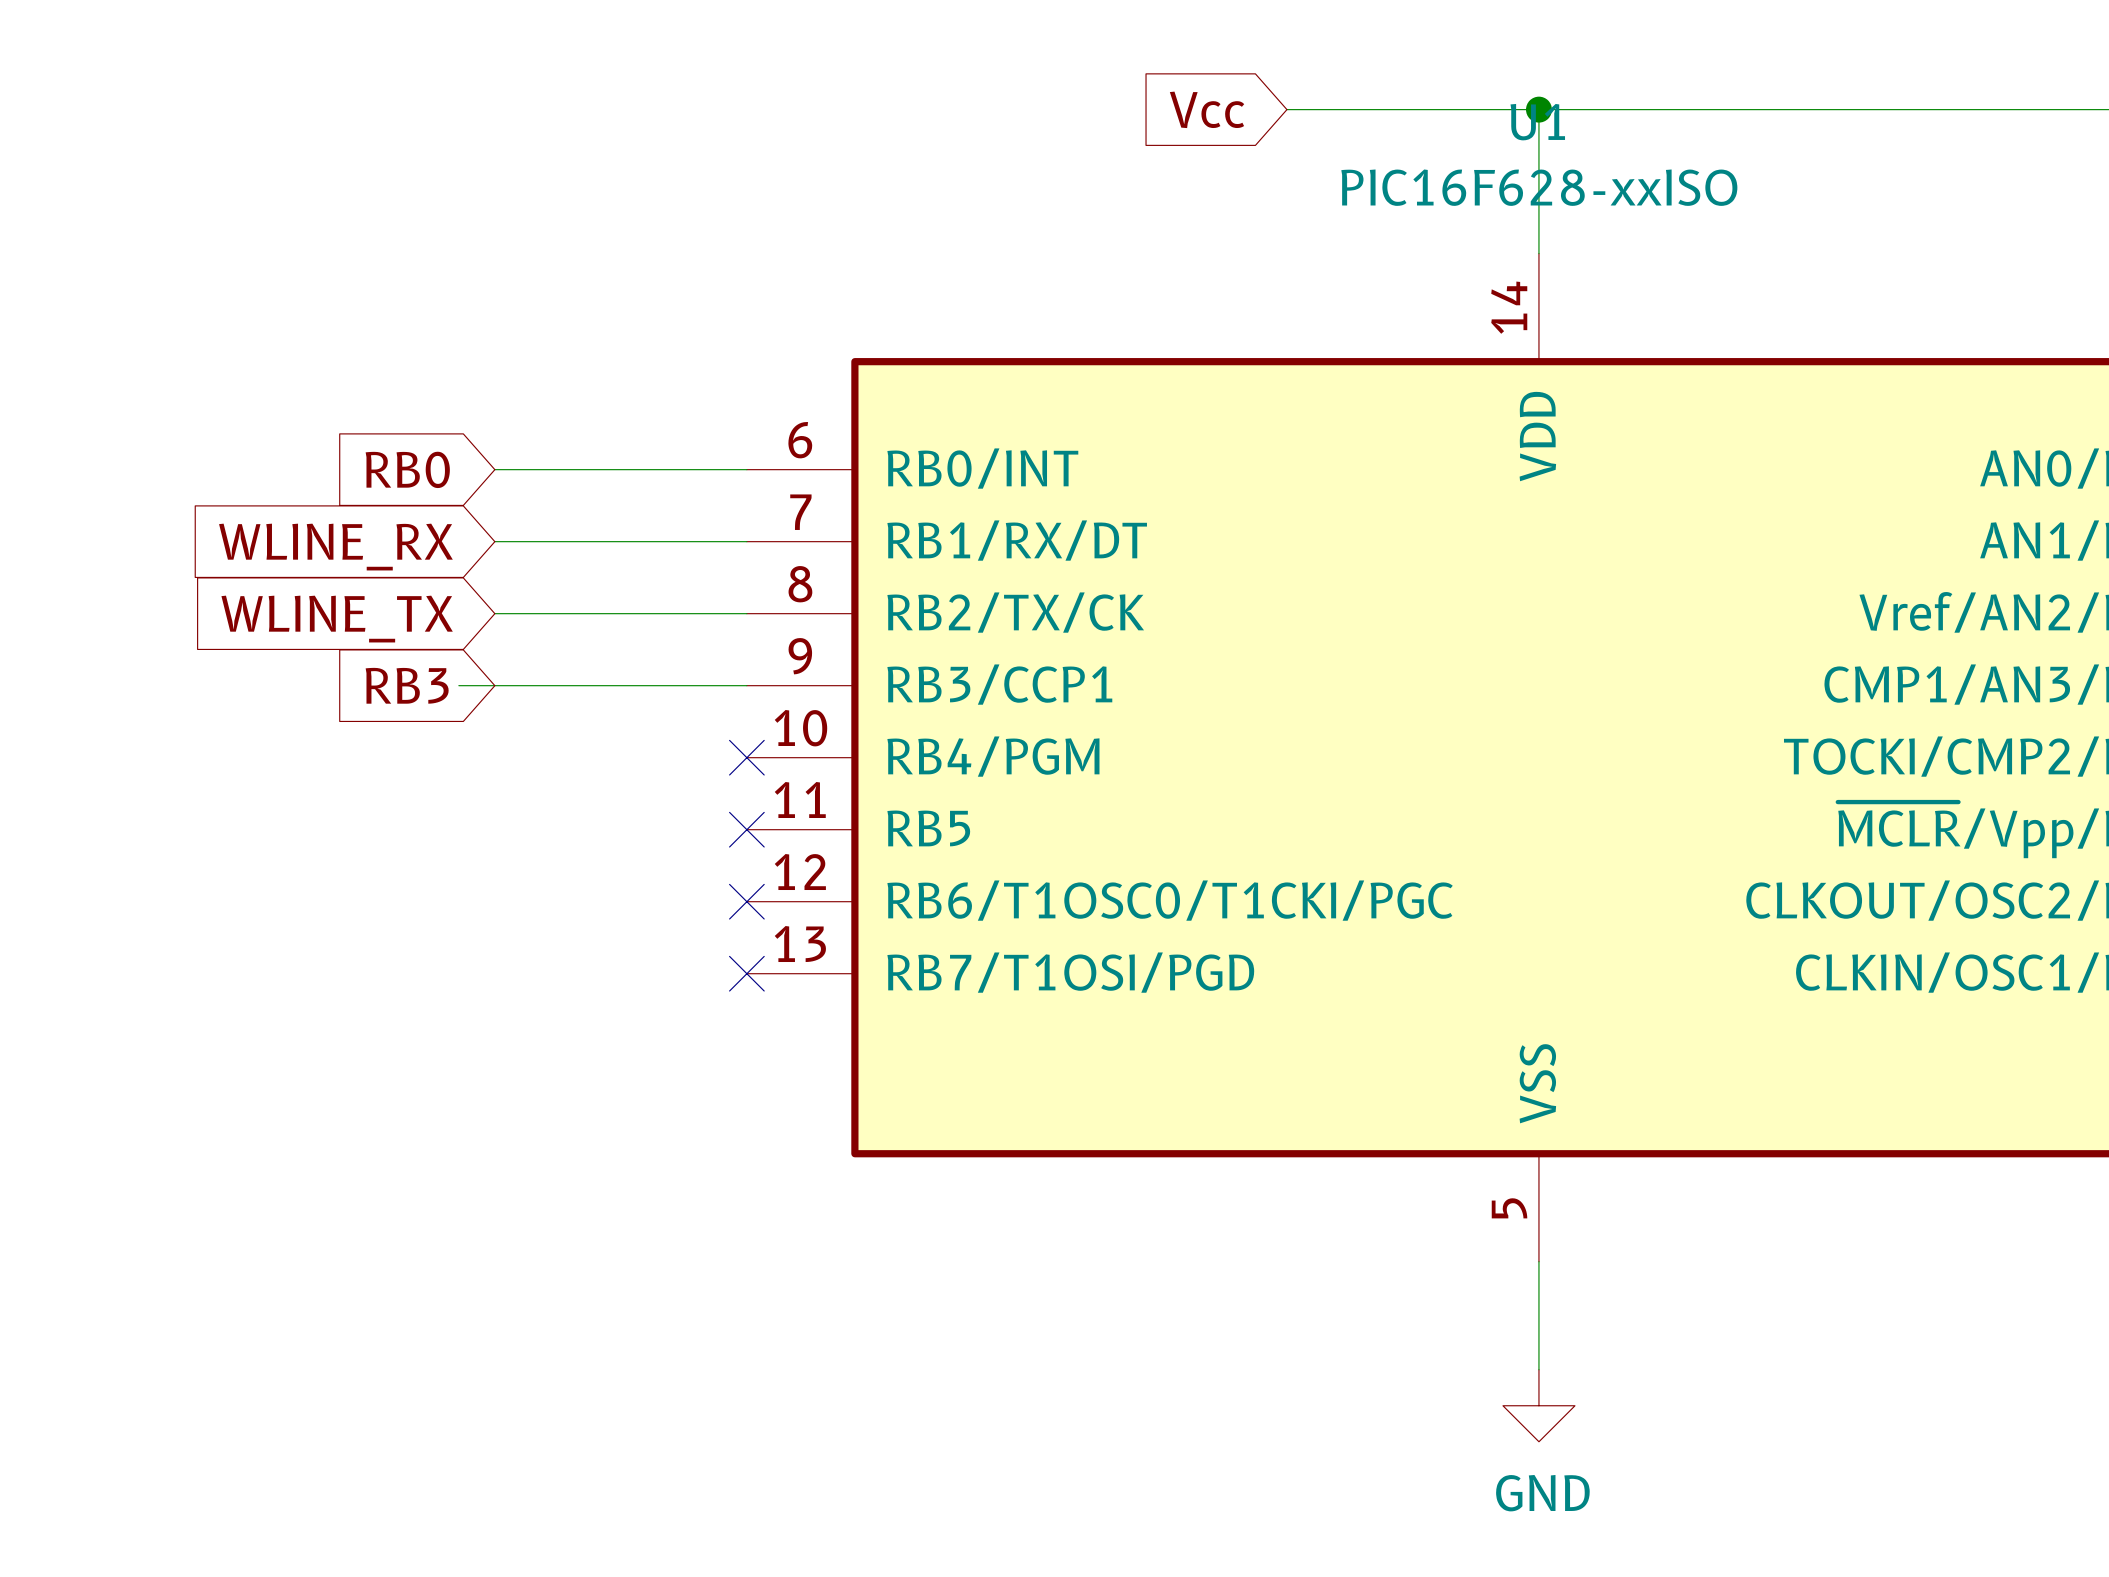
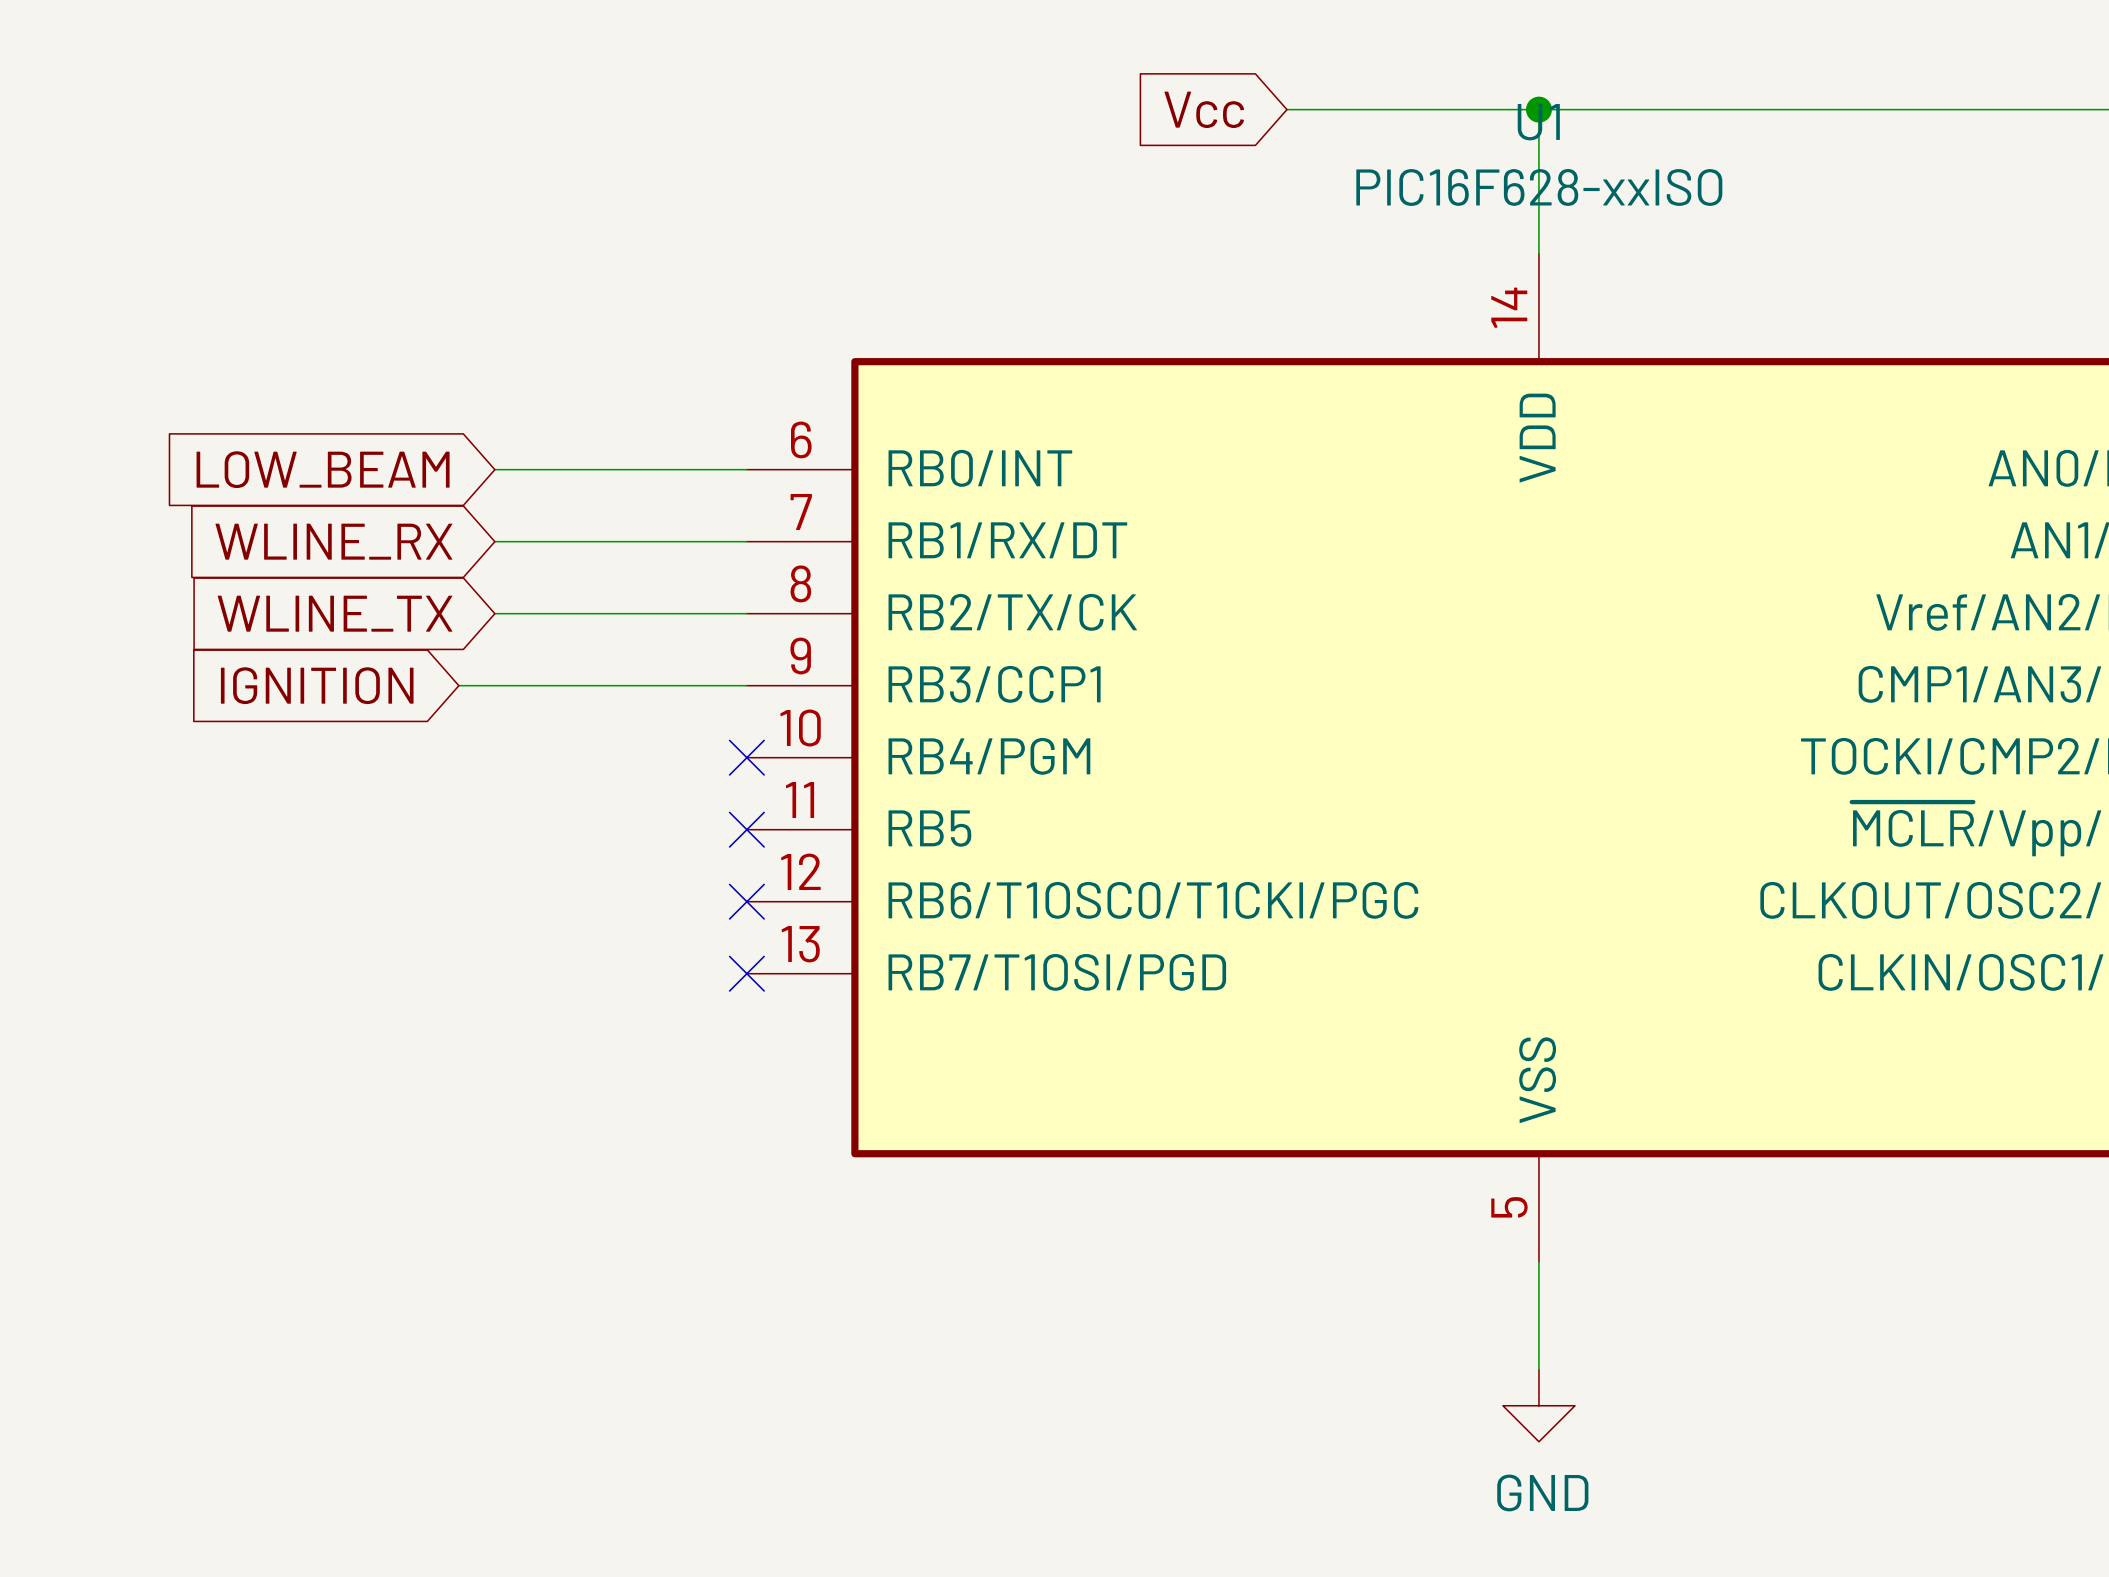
global label: RB0 (407, 469) -> LOW_BEAM (323, 469)
global label: none -> IGNITION (317, 685)
global label: RB3 (407, 685) -> none

